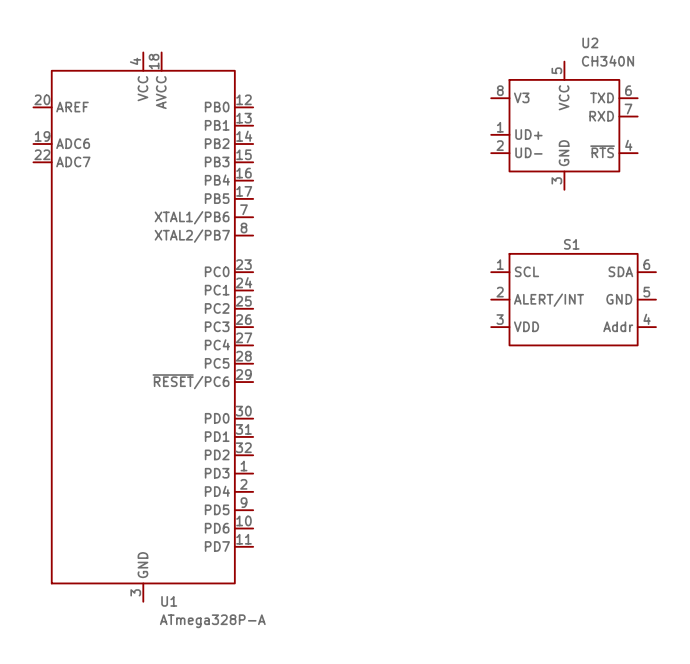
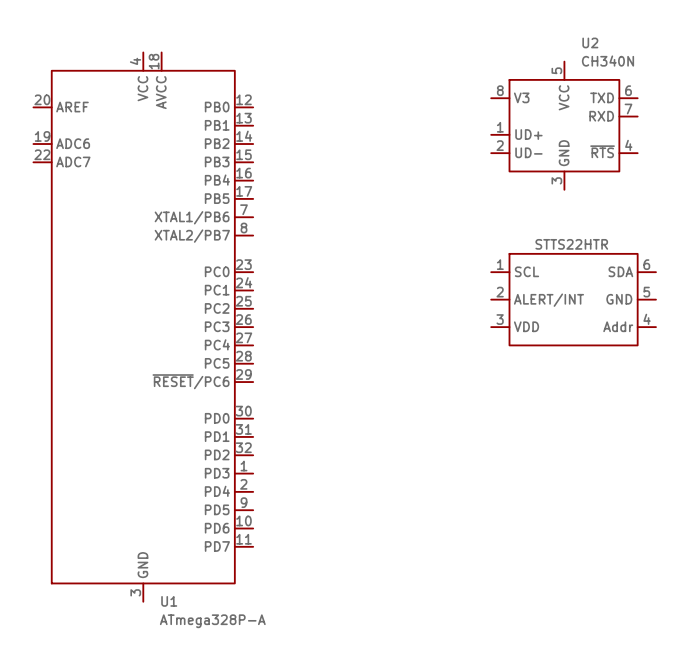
S1 name: S1 (571, 244) -> STTS22HTR (571, 244)

